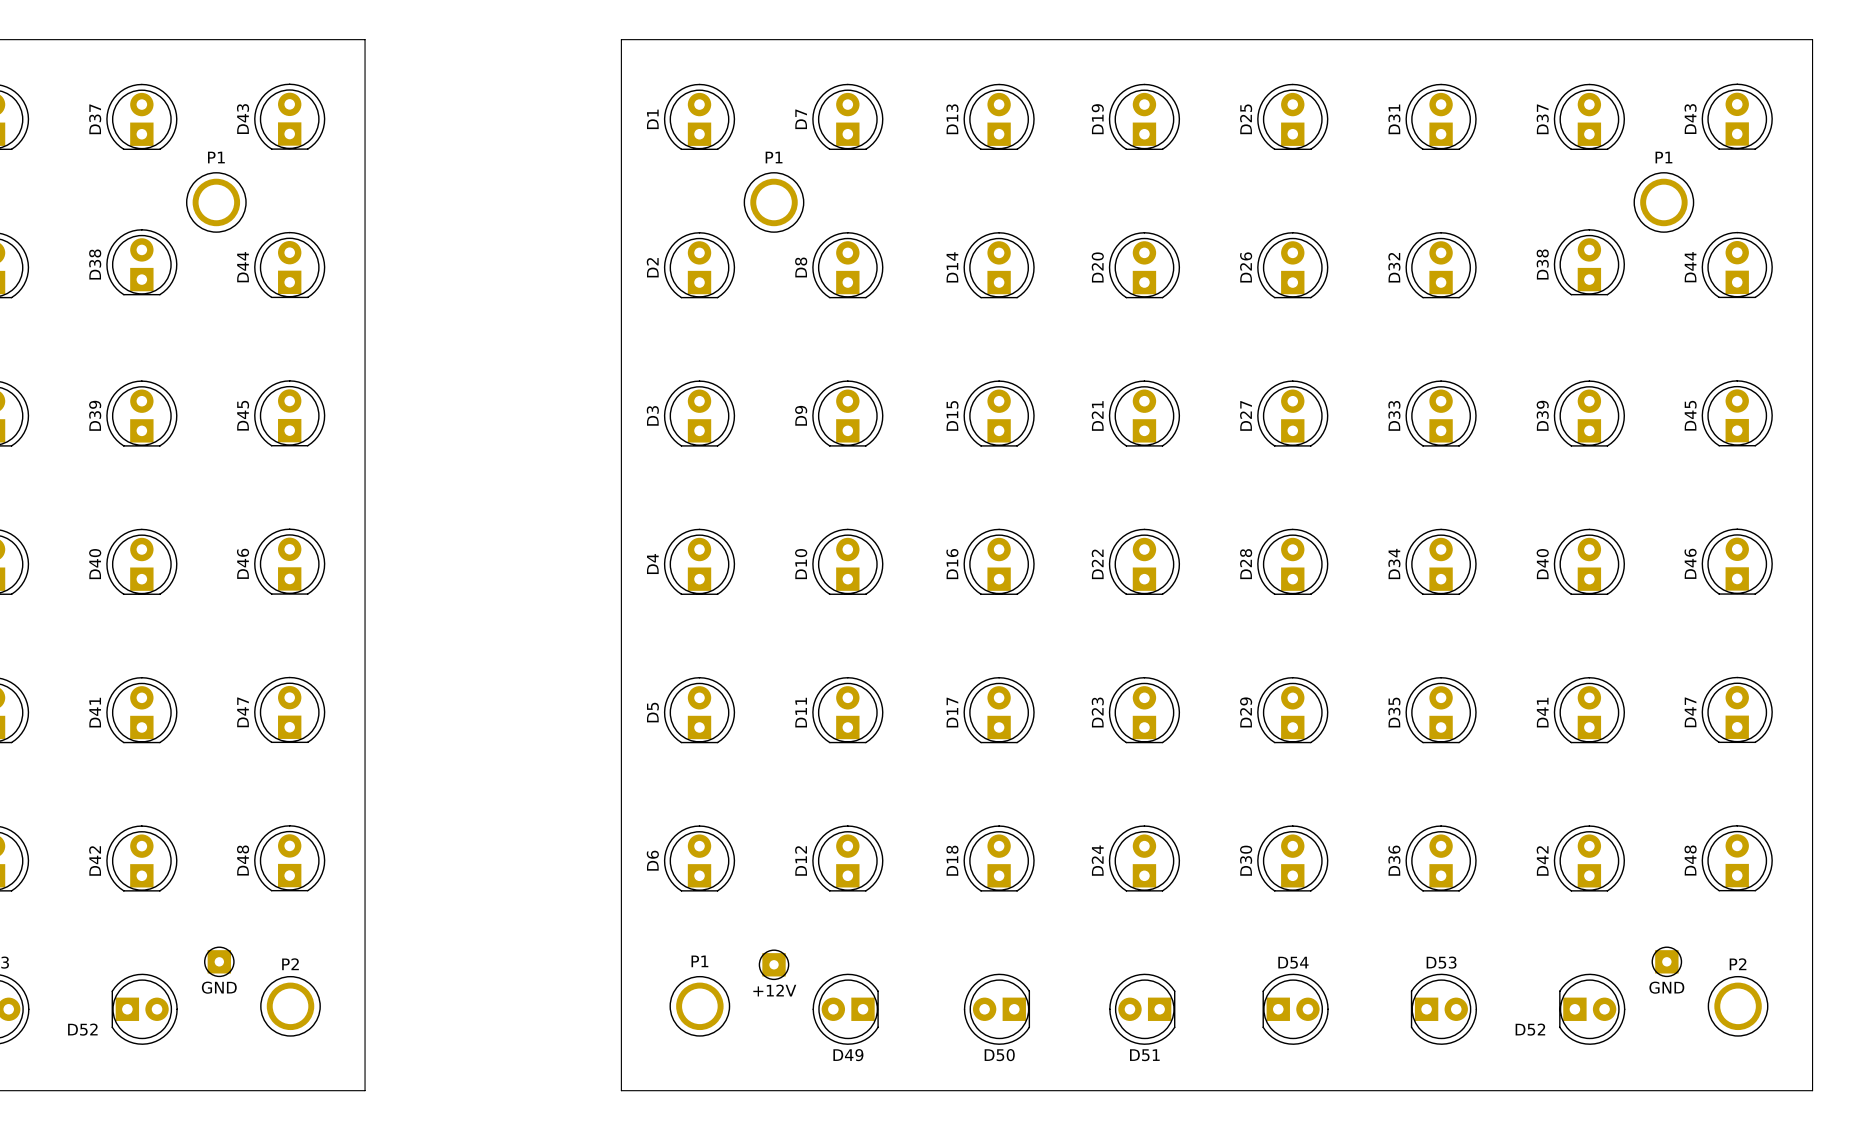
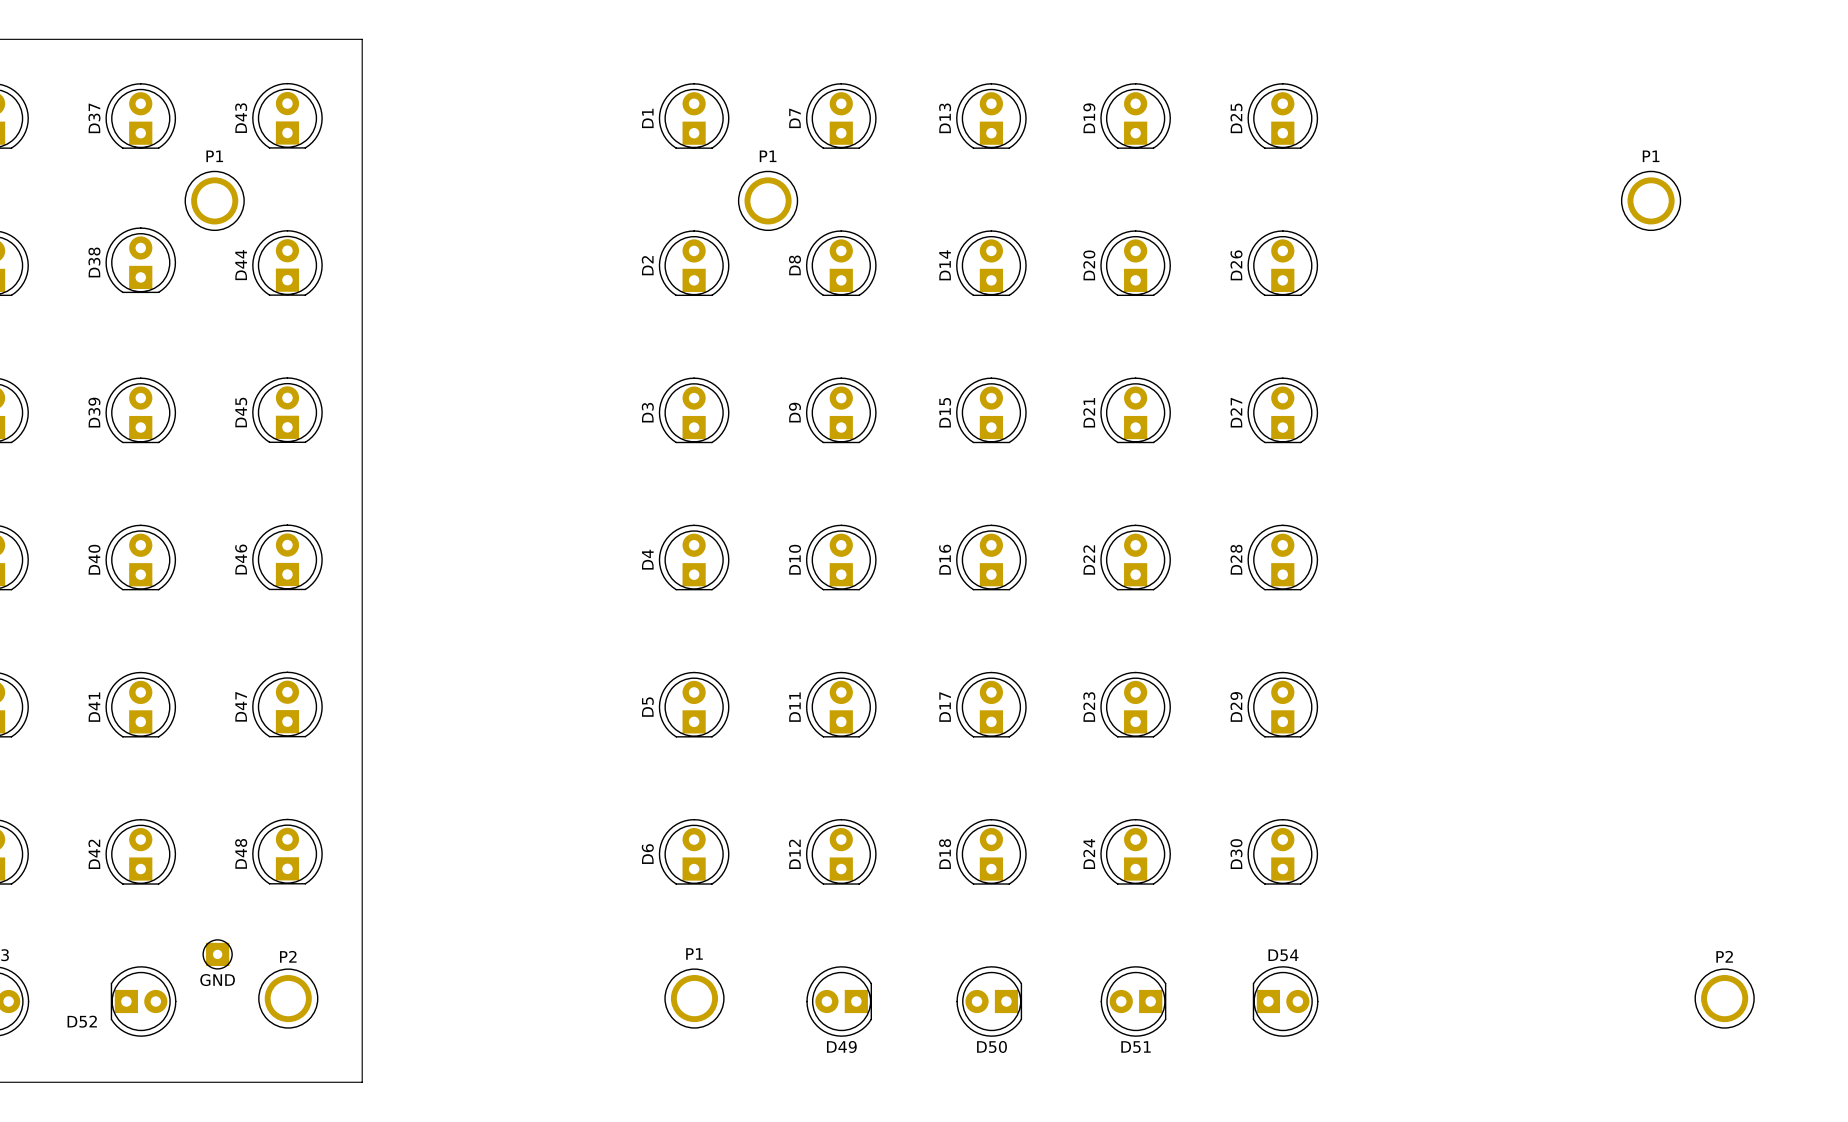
board edge: (621, 39) (1812, 39) (1812, 1090) (621, 1090) (621, 39) -> none
D31: (1441, 116) -> none
D37: (1589, 116) -> none
D43: (1737, 116) -> none
D38: (1589, 262) -> none
D44: (1737, 264) -> none
D32: (1441, 265) -> none
D33: (1441, 413) -> none
D39: (1589, 413) -> none
D45: (1737, 413) -> none
D34: (1441, 561) -> none
D40: (1589, 561) -> none
D46: (1737, 561) -> none
D47: (1737, 709) -> none
D35: (1441, 710) -> none
D41: (1589, 710) -> none
D36: (1441, 858) -> none
D42: (1589, 858) -> none
D48: (1737, 858) -> none
GND: (1666, 961) -> none
+12V: (774, 964) -> none
D53: (1443, 1009) -> none
D52: (1592, 1009) -> none

